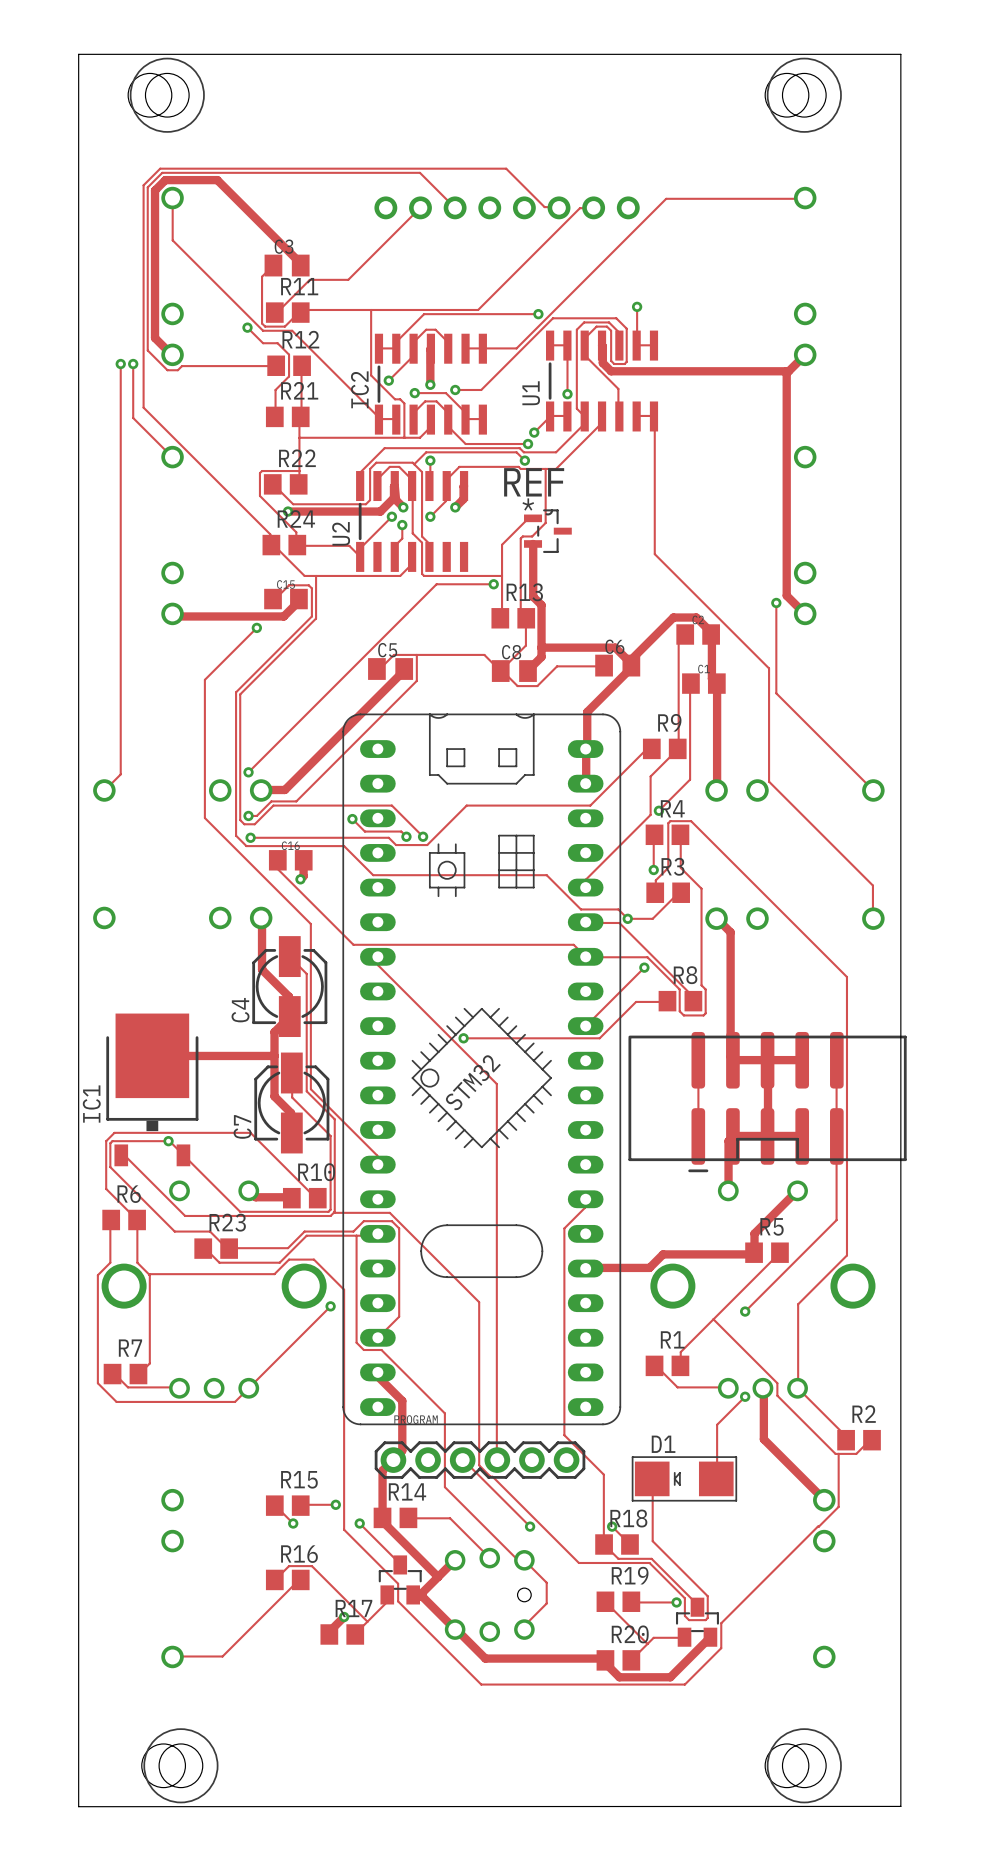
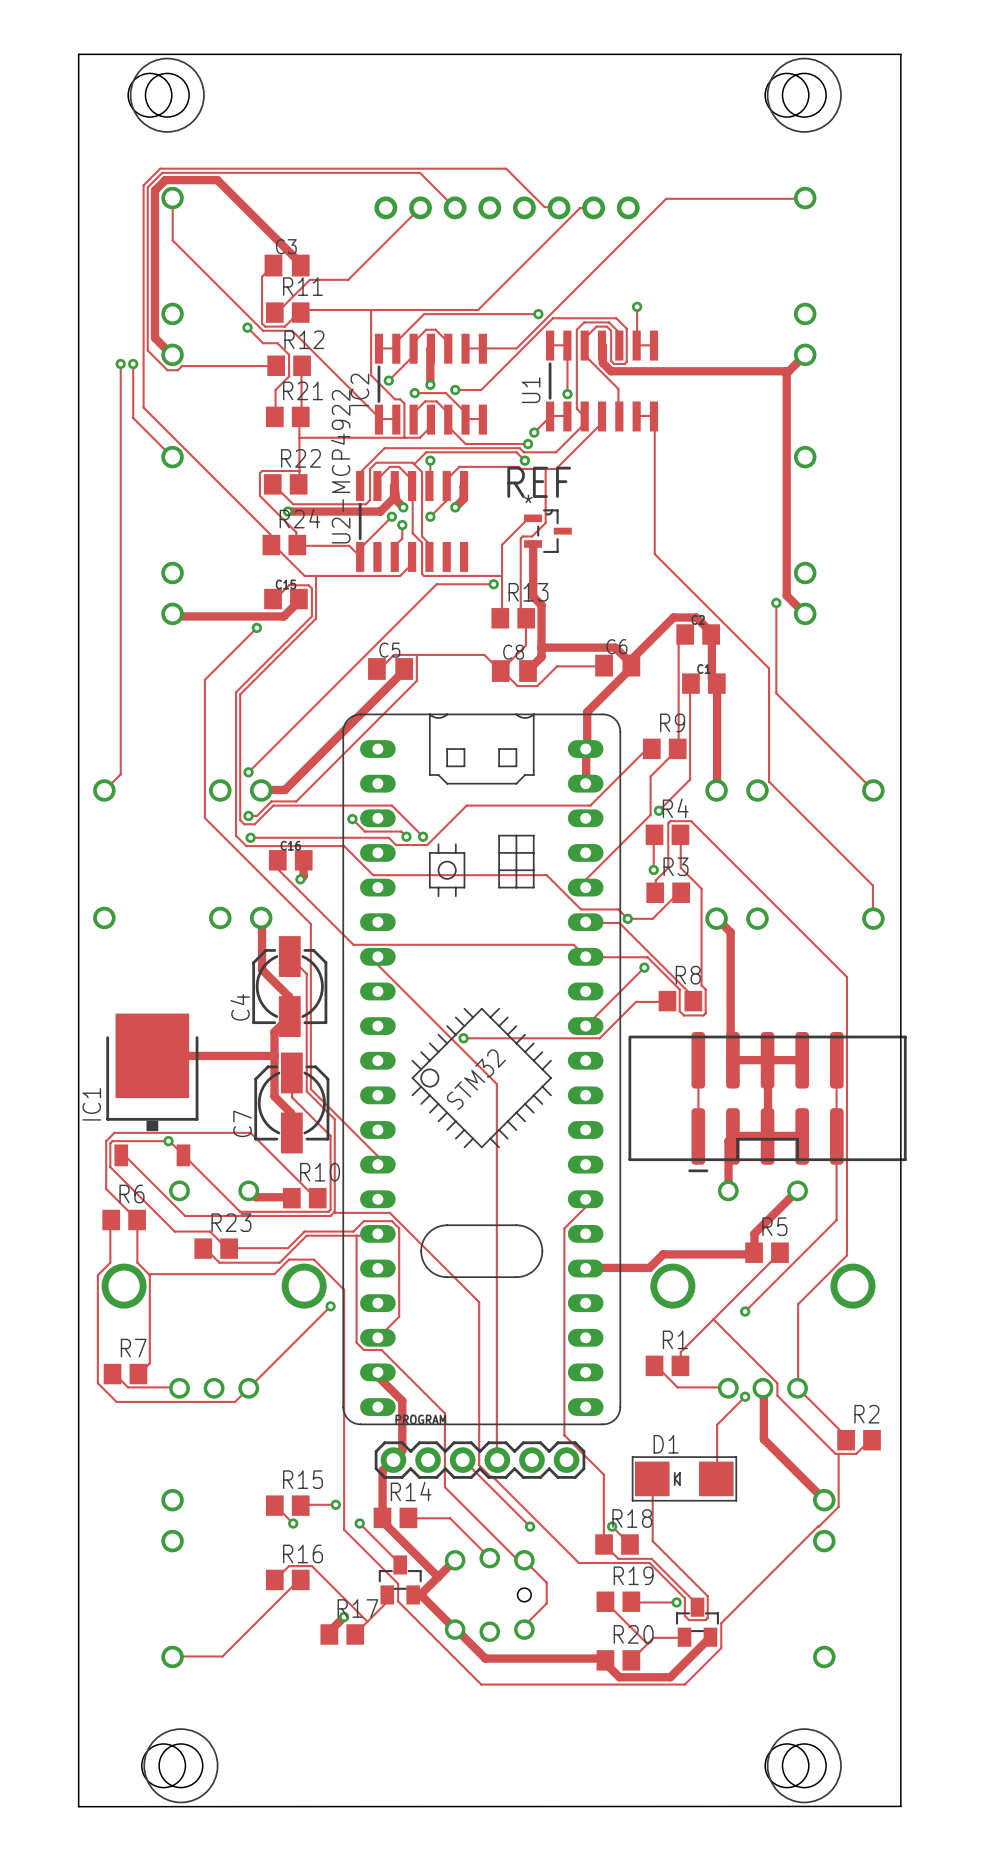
U2 name: U2 (341, 533) -> U2-MCP4922 (340, 466)

